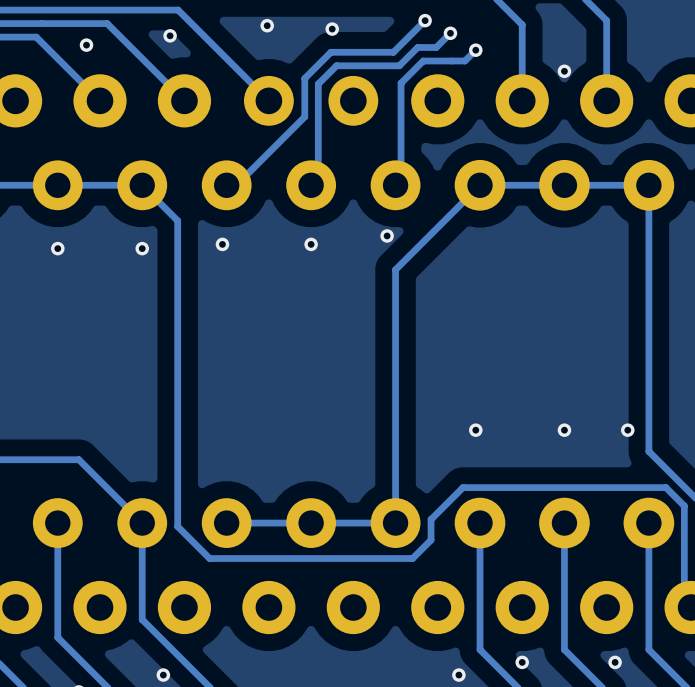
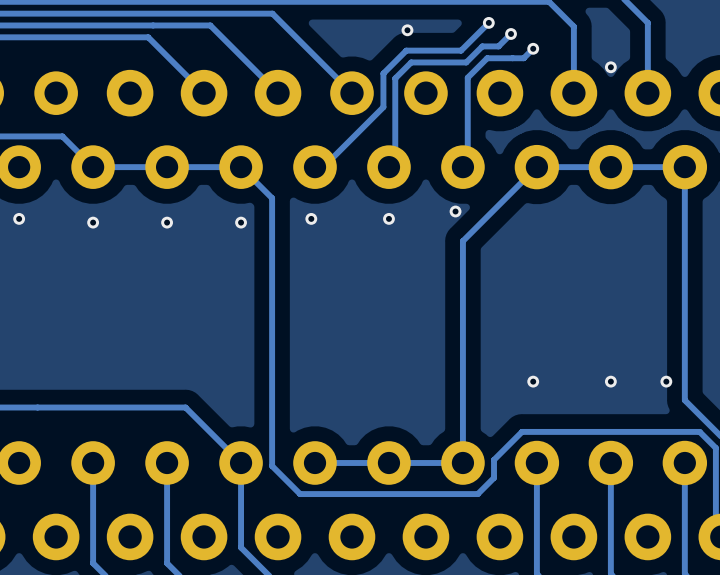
via: (267, 25) -> none
via: (170, 35) -> none
via: (86, 45) -> none

